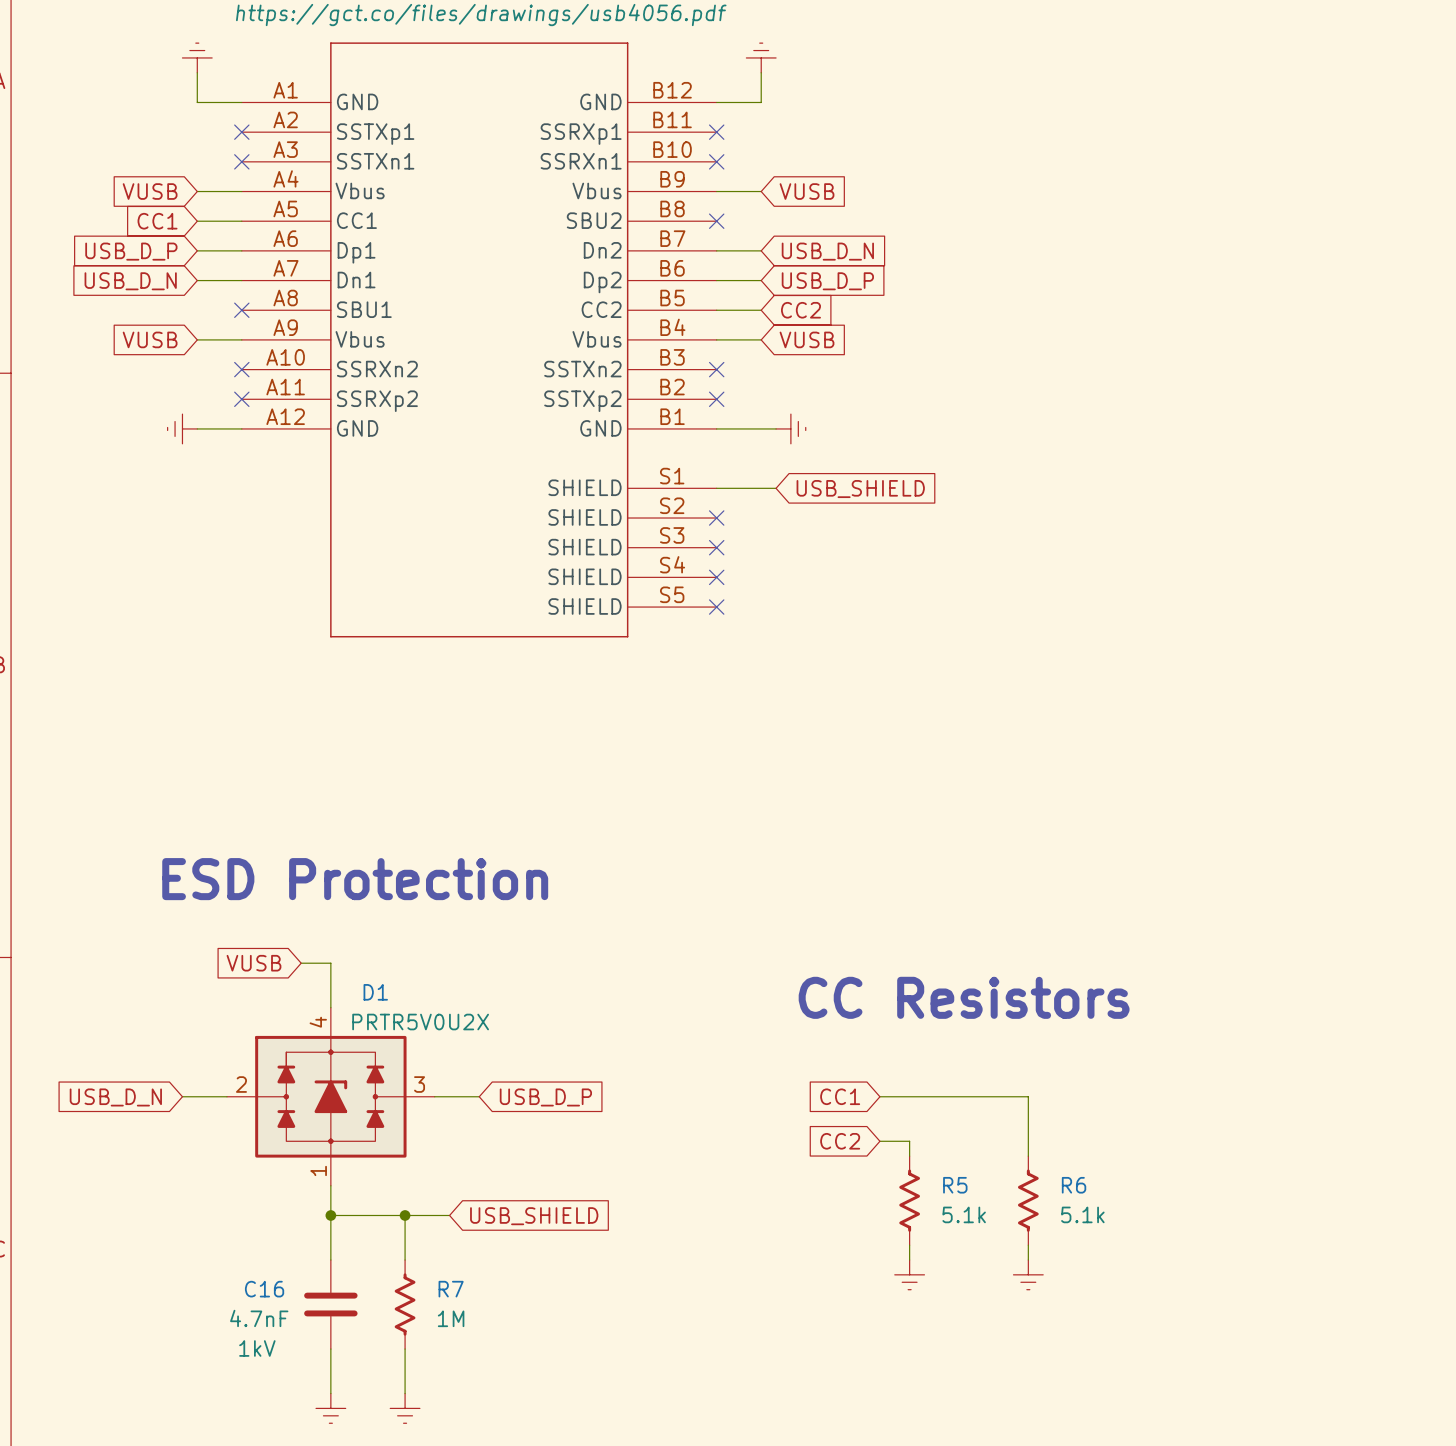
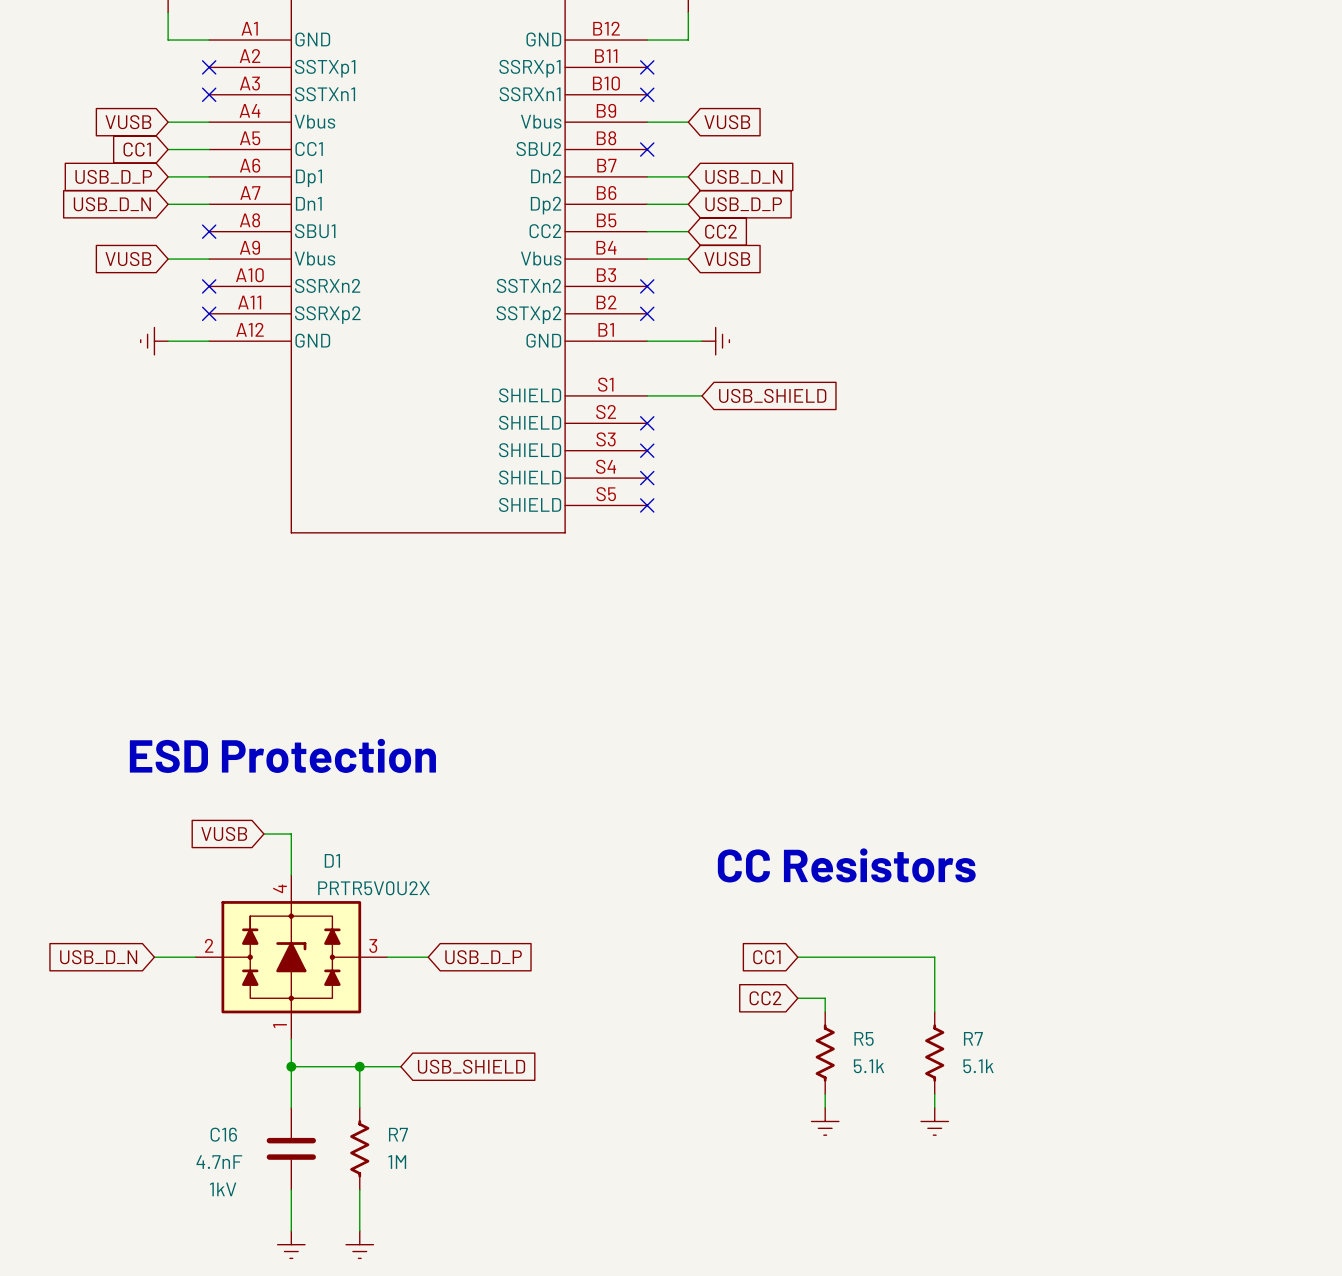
R6 name: R6 (1074, 1185) -> R7 (973, 1038)

